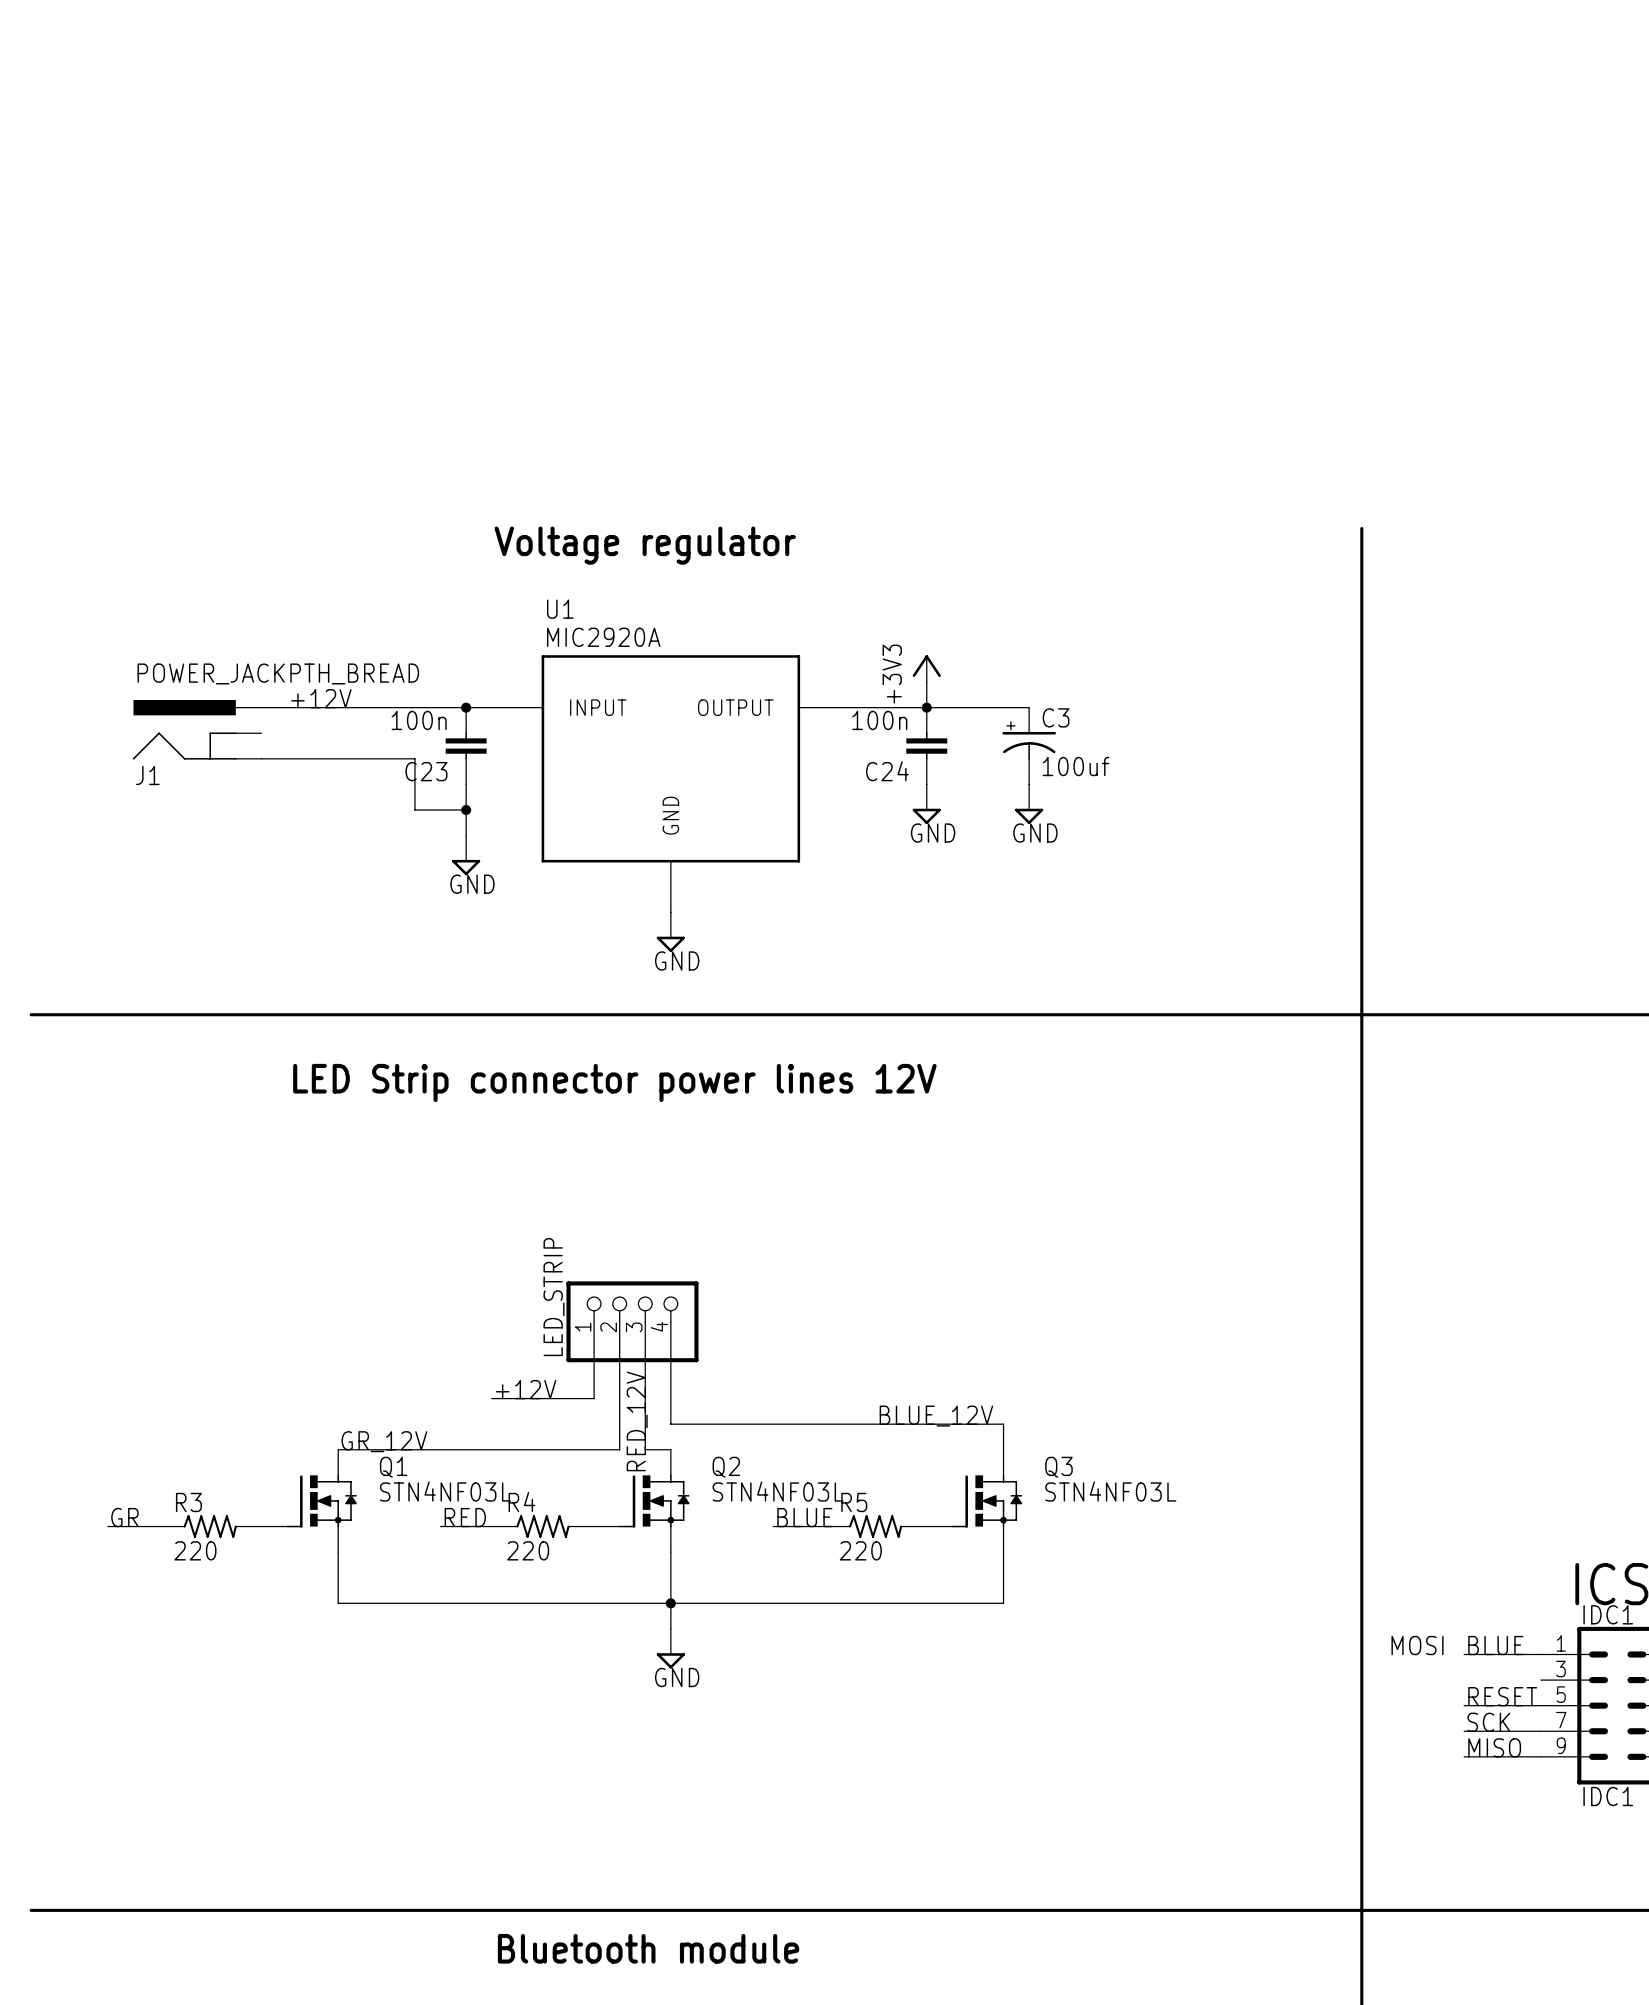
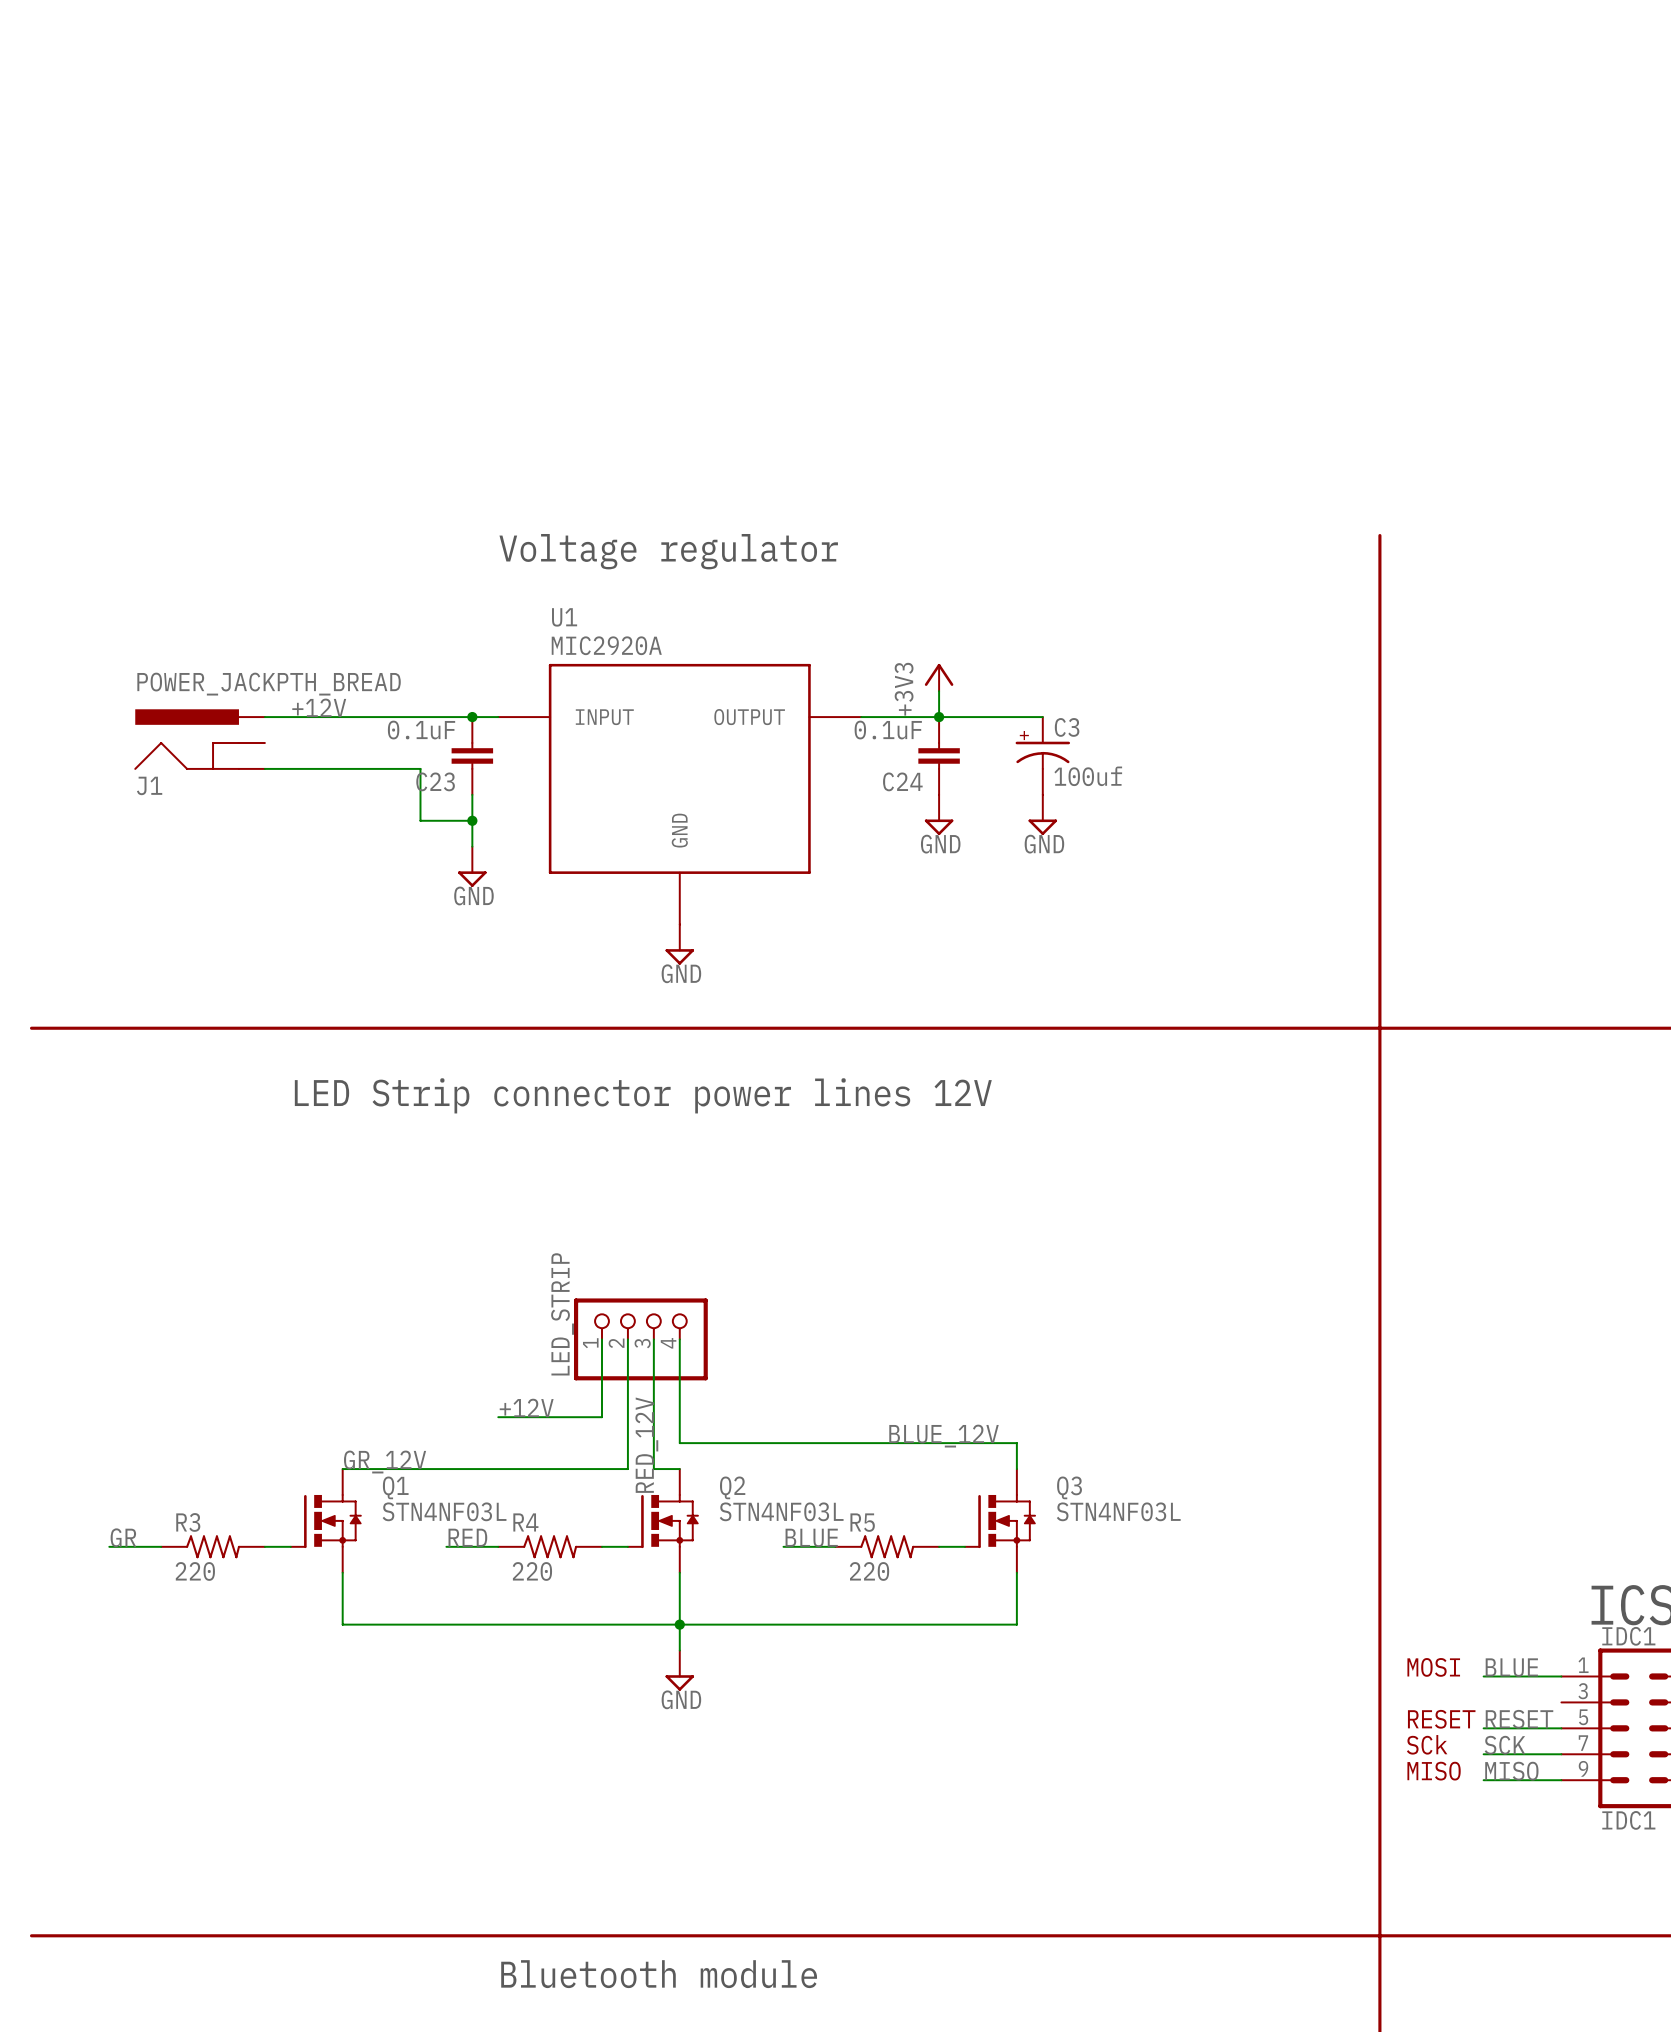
C23 value: 100n (419, 720) -> 0.1uF (421, 730)
C24 value: 100n (879, 720) -> 0.1uF (888, 730)
text: none -> RESET (1441, 1719)
text: none -> SCk (1427, 1744)
text: none -> MISO (1434, 1771)

